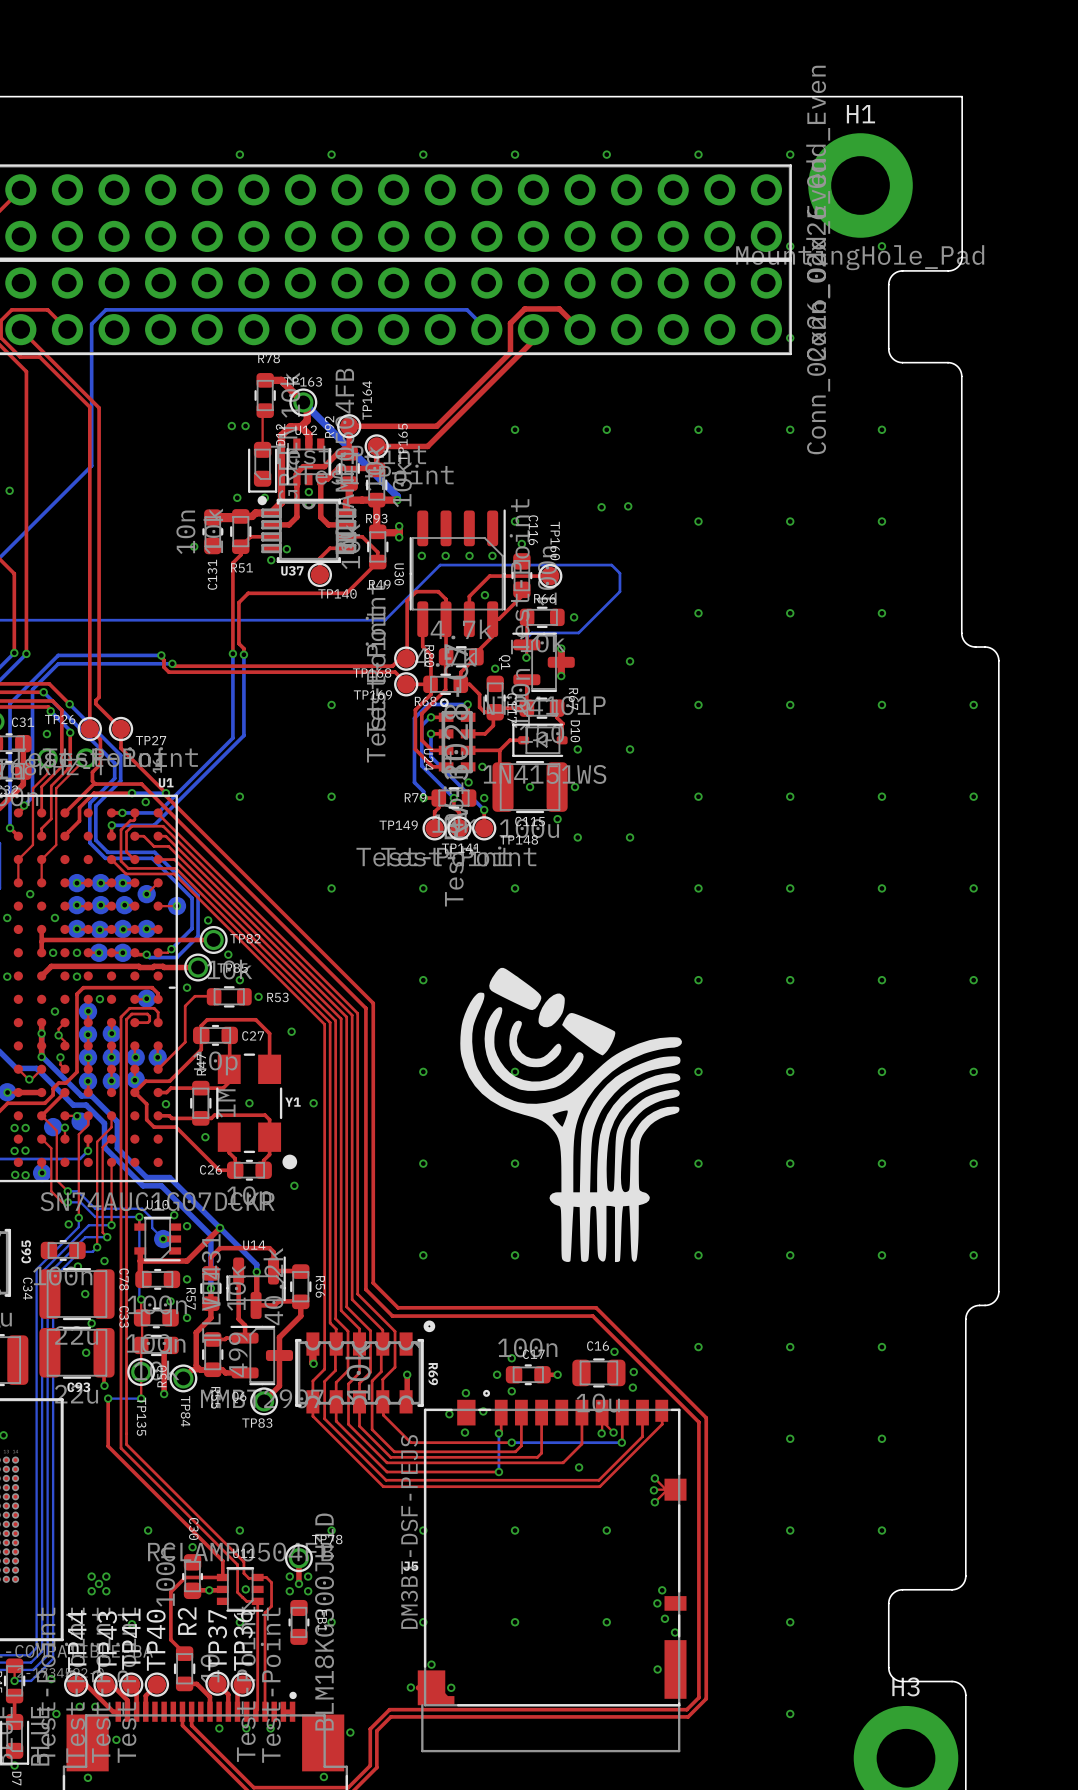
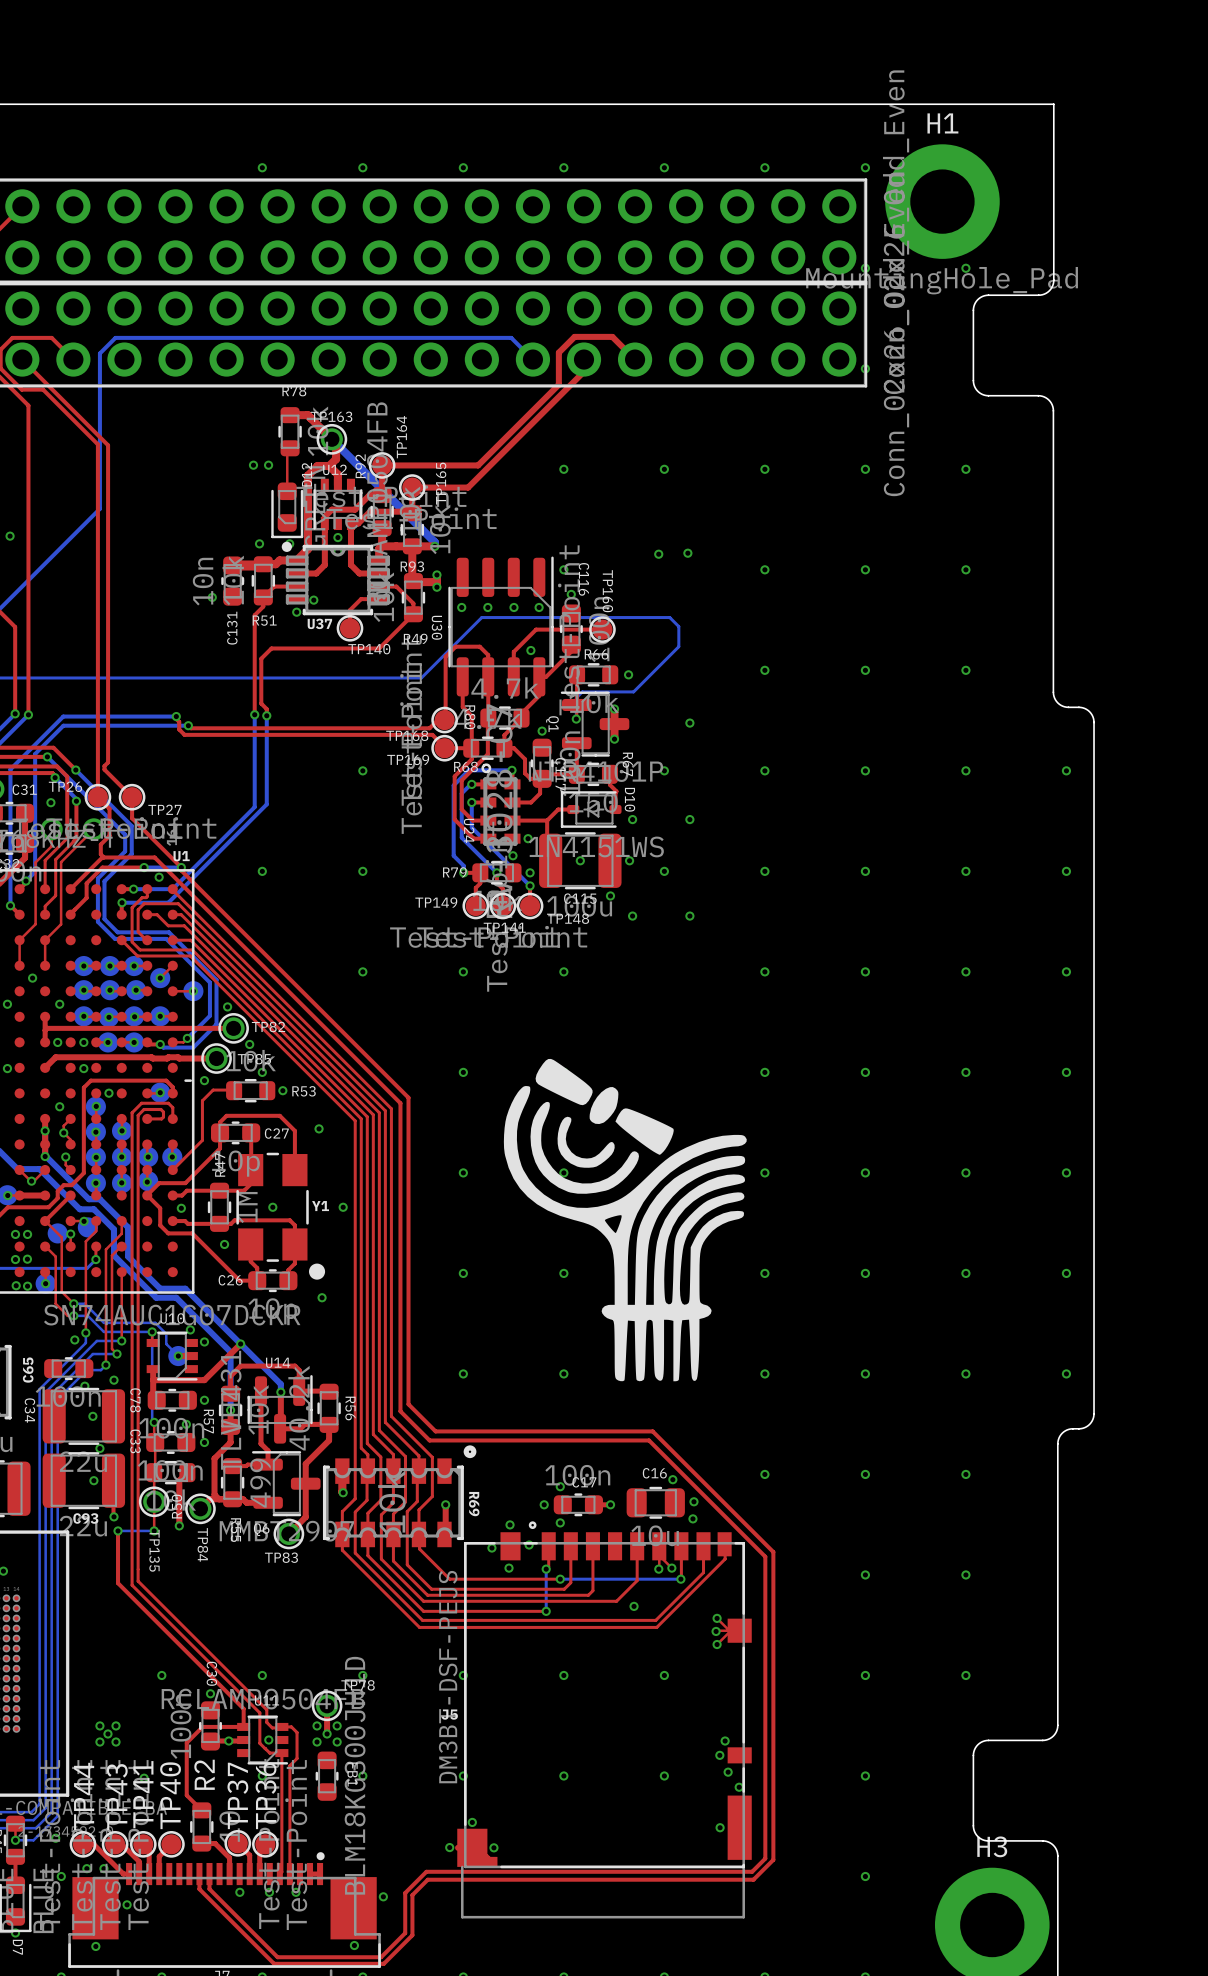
via: none -> (664, 770)
via: none -> (664, 871)

